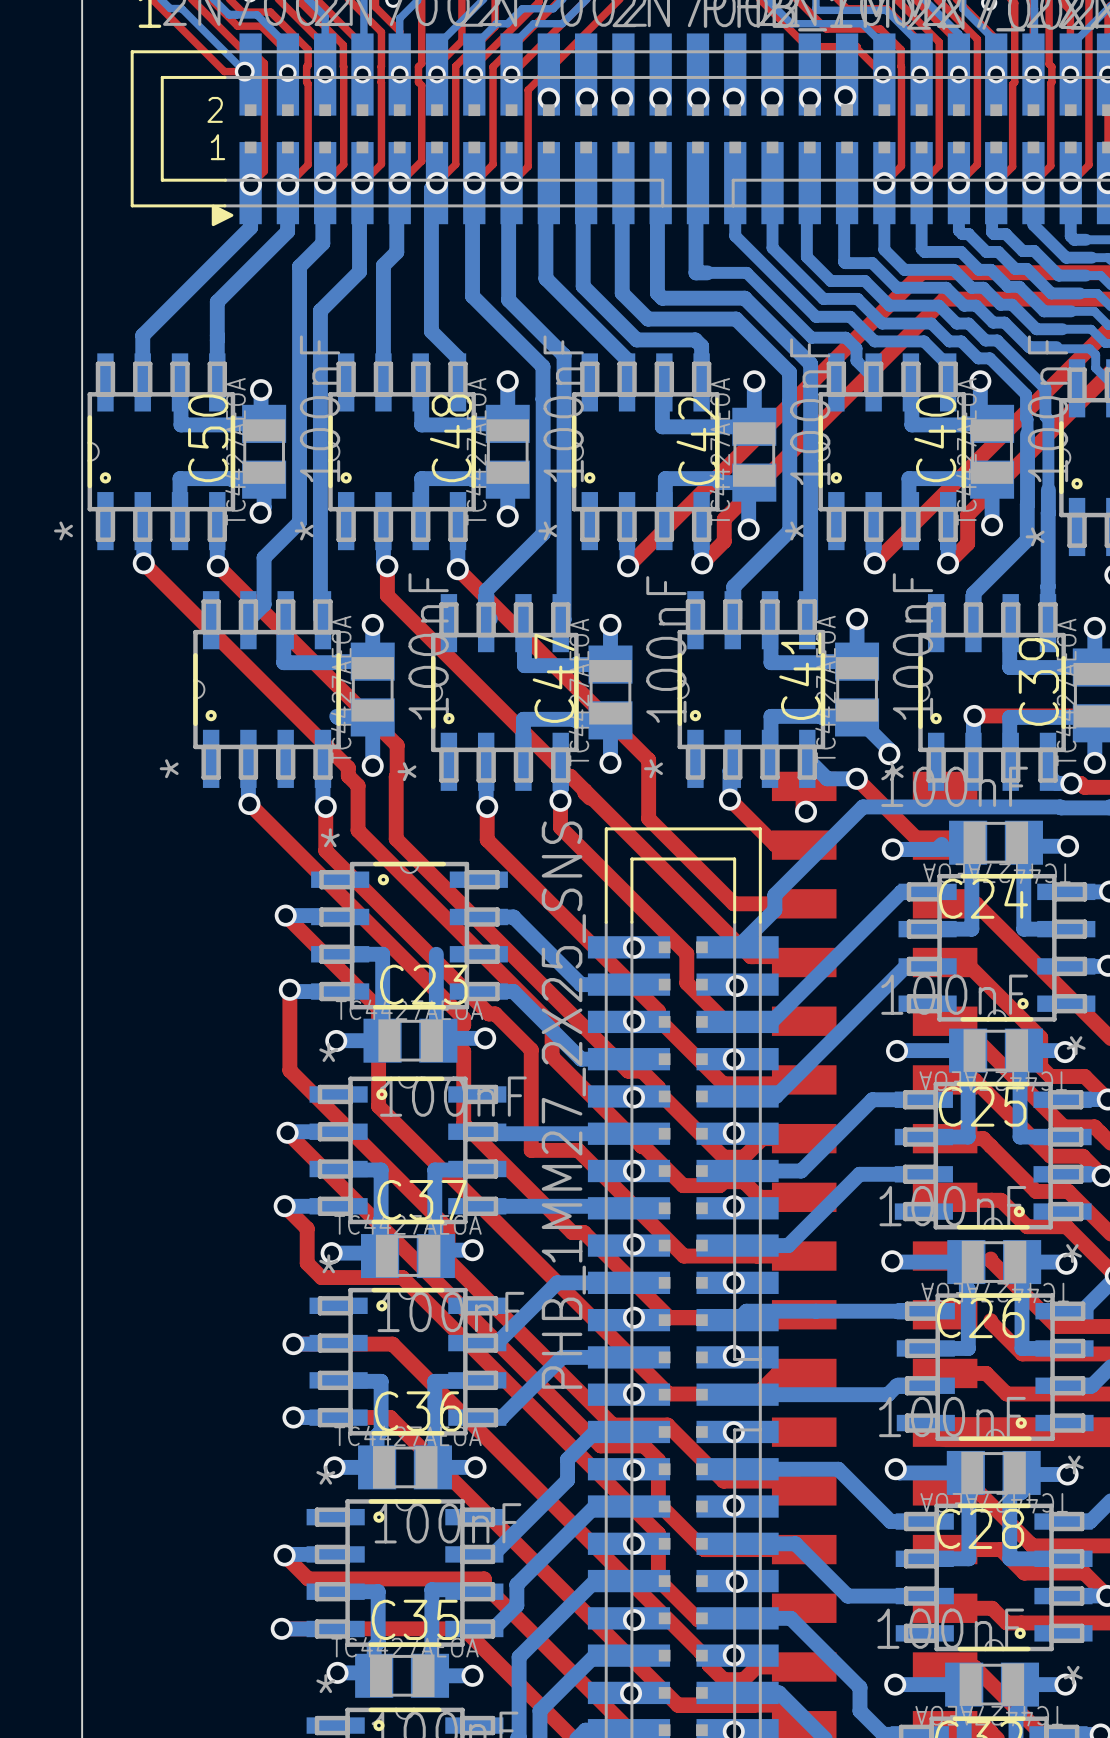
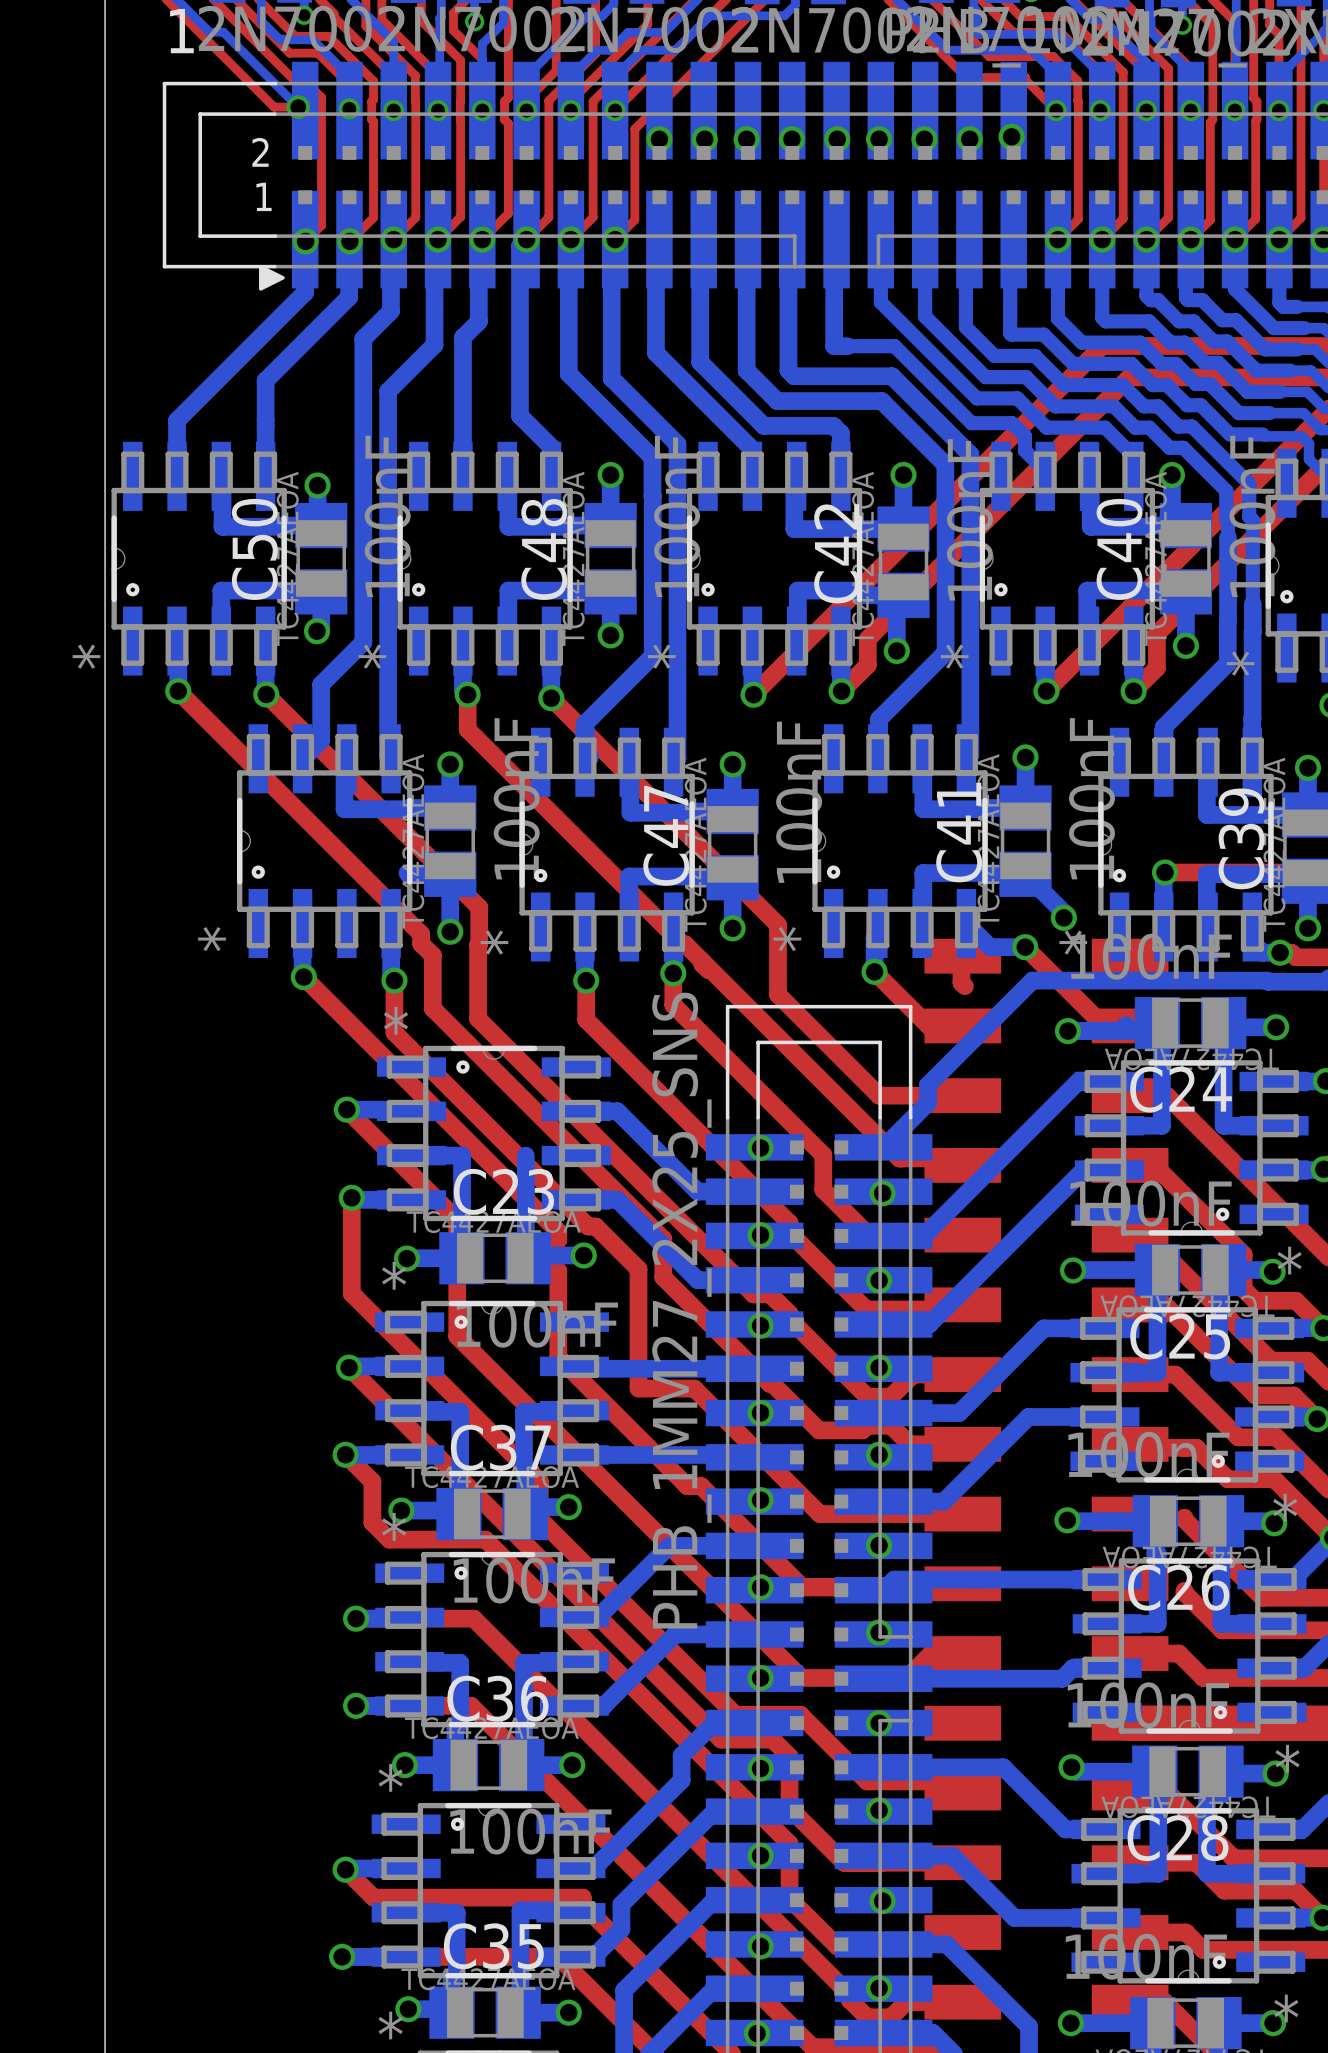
via: (806, 811) -> none

